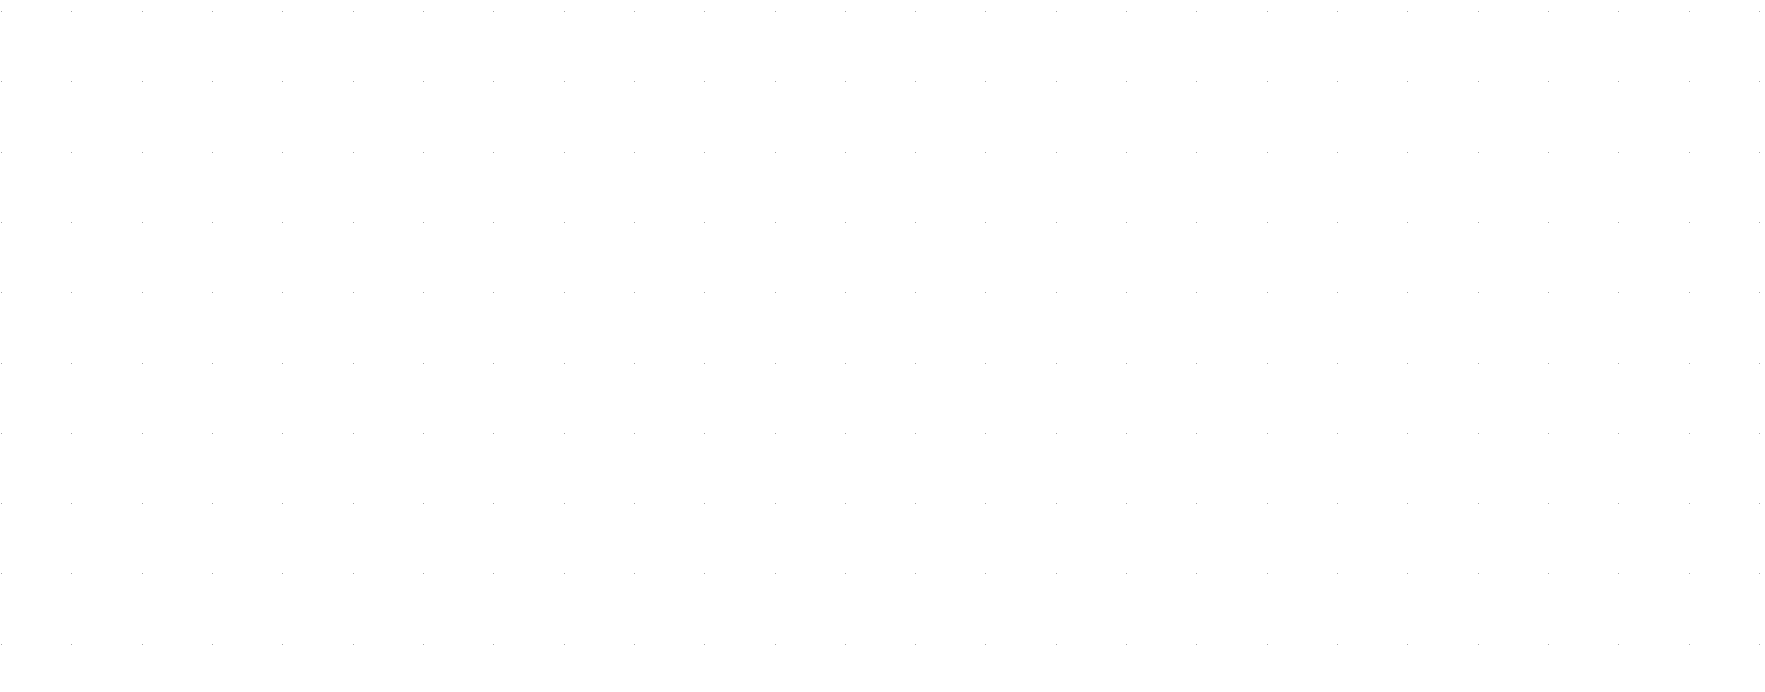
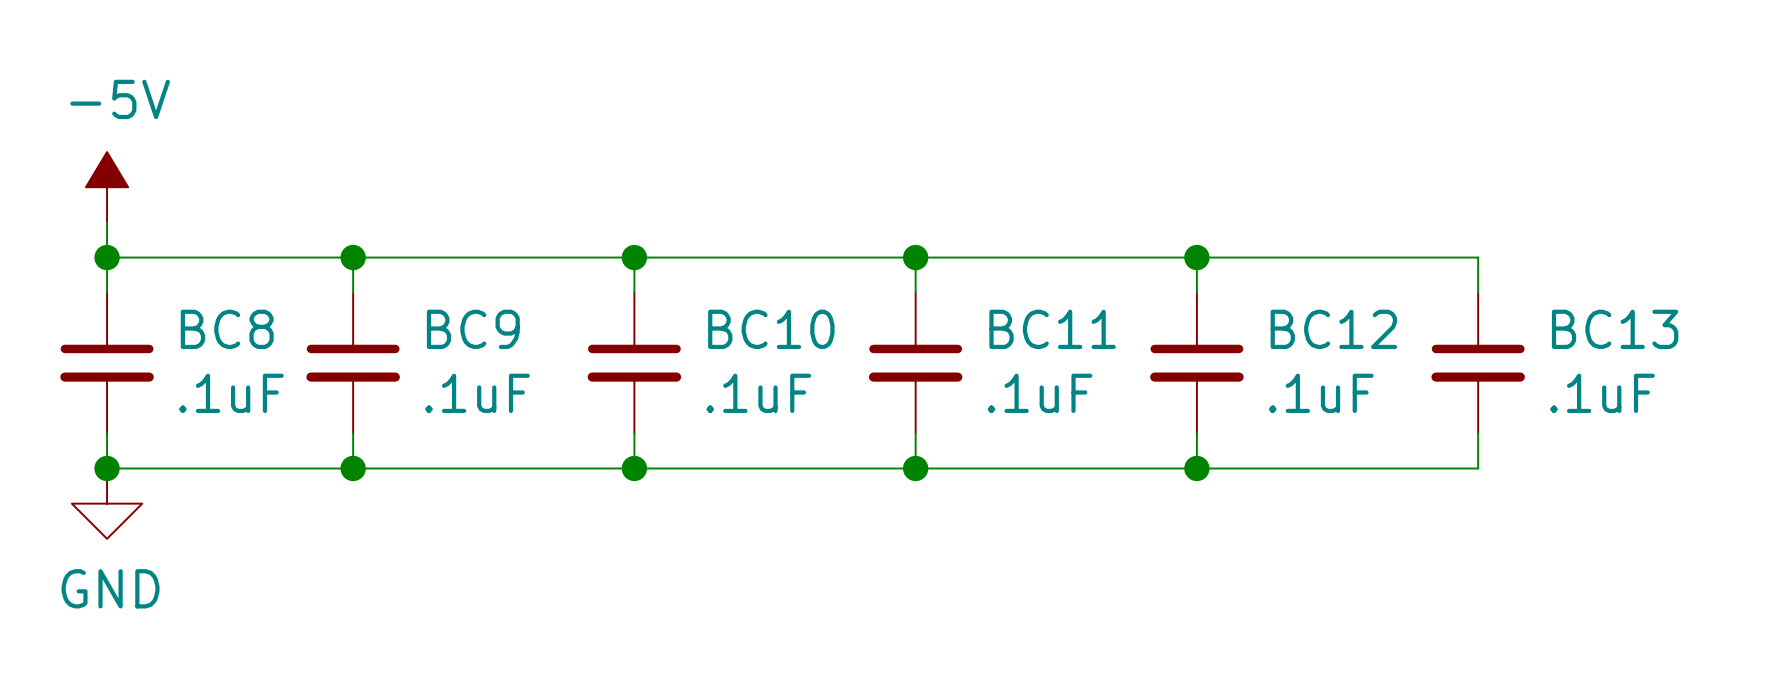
power symbol: none -> -5V (107, 187)
wire: none -> (107, 222) (107, 292)
wire: none -> (107, 257) (1478, 257) (1478, 292)
junction: none -> (107, 257)
wire: none -> (353, 257) (353, 292)
junction: none -> (353, 257)
wire: none -> (634, 257) (634, 292)
junction: none -> (634, 257)
wire: none -> (915, 257) (915, 292)
junction: none -> (915, 257)
wire: none -> (1196, 257) (1196, 292)
junction: none -> (1196, 257)
BC8: none -> .1uF (107, 363)
BC9: none -> .1uF (353, 363)
BC10: none -> .1uF (634, 363)
BC11: none -> .1uF (915, 363)
BC12: none -> .1uF (1196, 363)
BC13: none -> .1uF (1478, 363)
wire: none -> (107, 433) (107, 468) (1478, 468) (1478, 433)
wire: none -> (353, 433) (353, 468)
wire: none -> (634, 433) (634, 468)
wire: none -> (915, 433) (915, 468)
wire: none -> (1196, 433) (1196, 468)
junction: none -> (107, 468)
junction: none -> (353, 468)
junction: none -> (634, 468)
junction: none -> (915, 468)
junction: none -> (1196, 468)
power symbol: none -> GND (107, 503)

